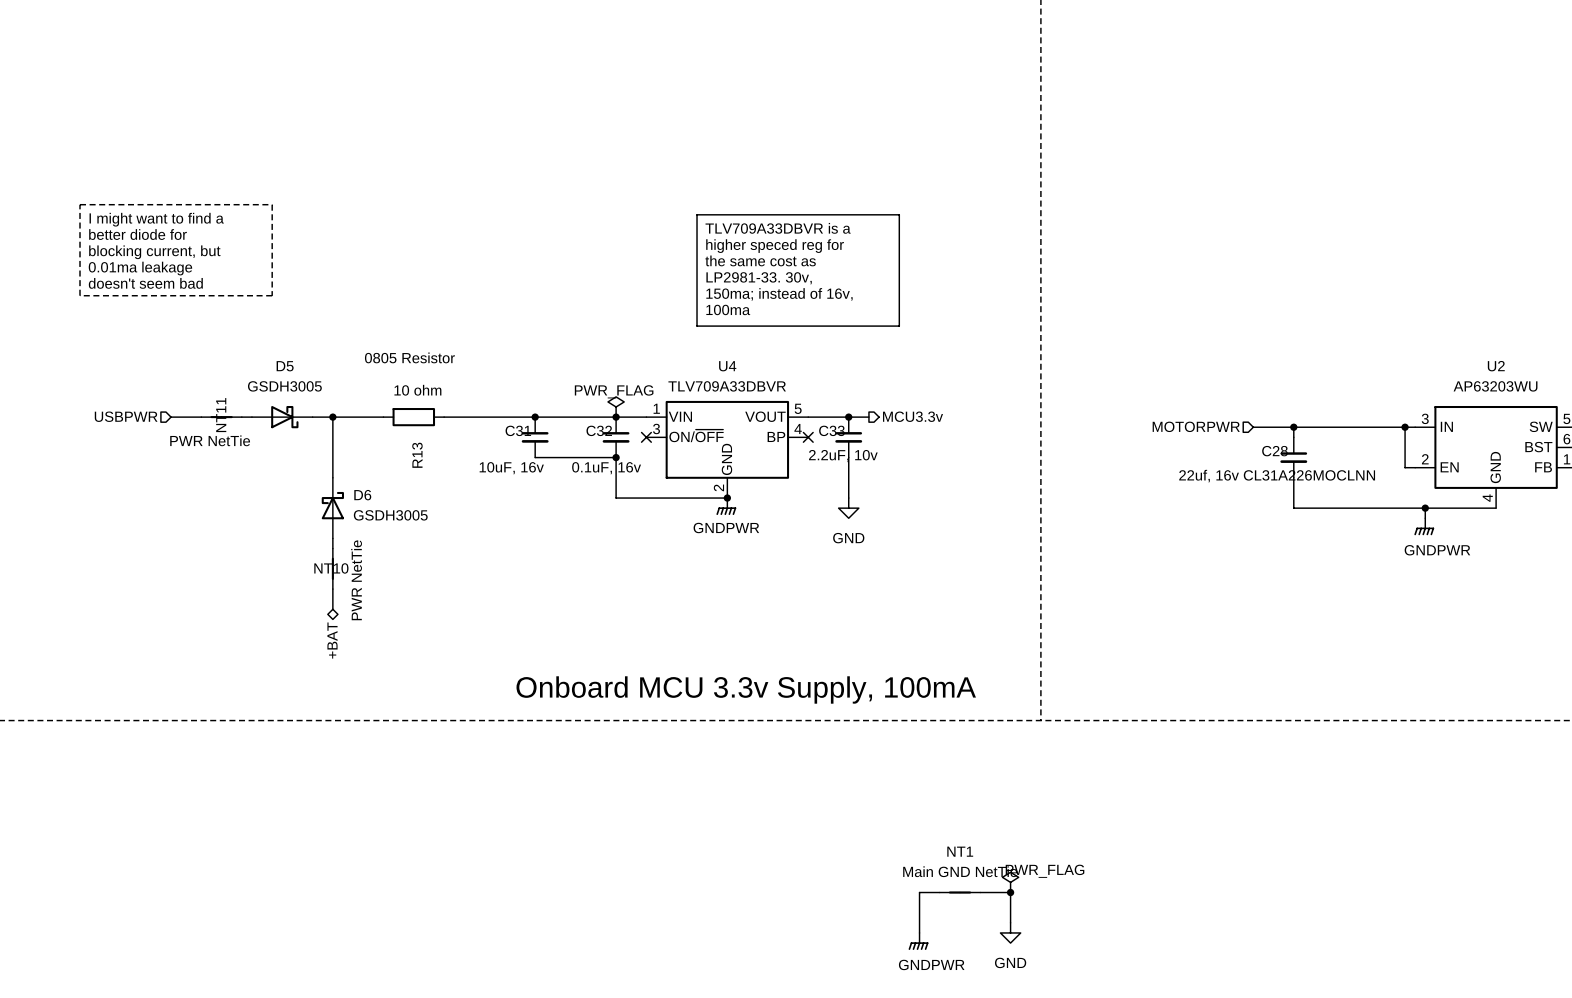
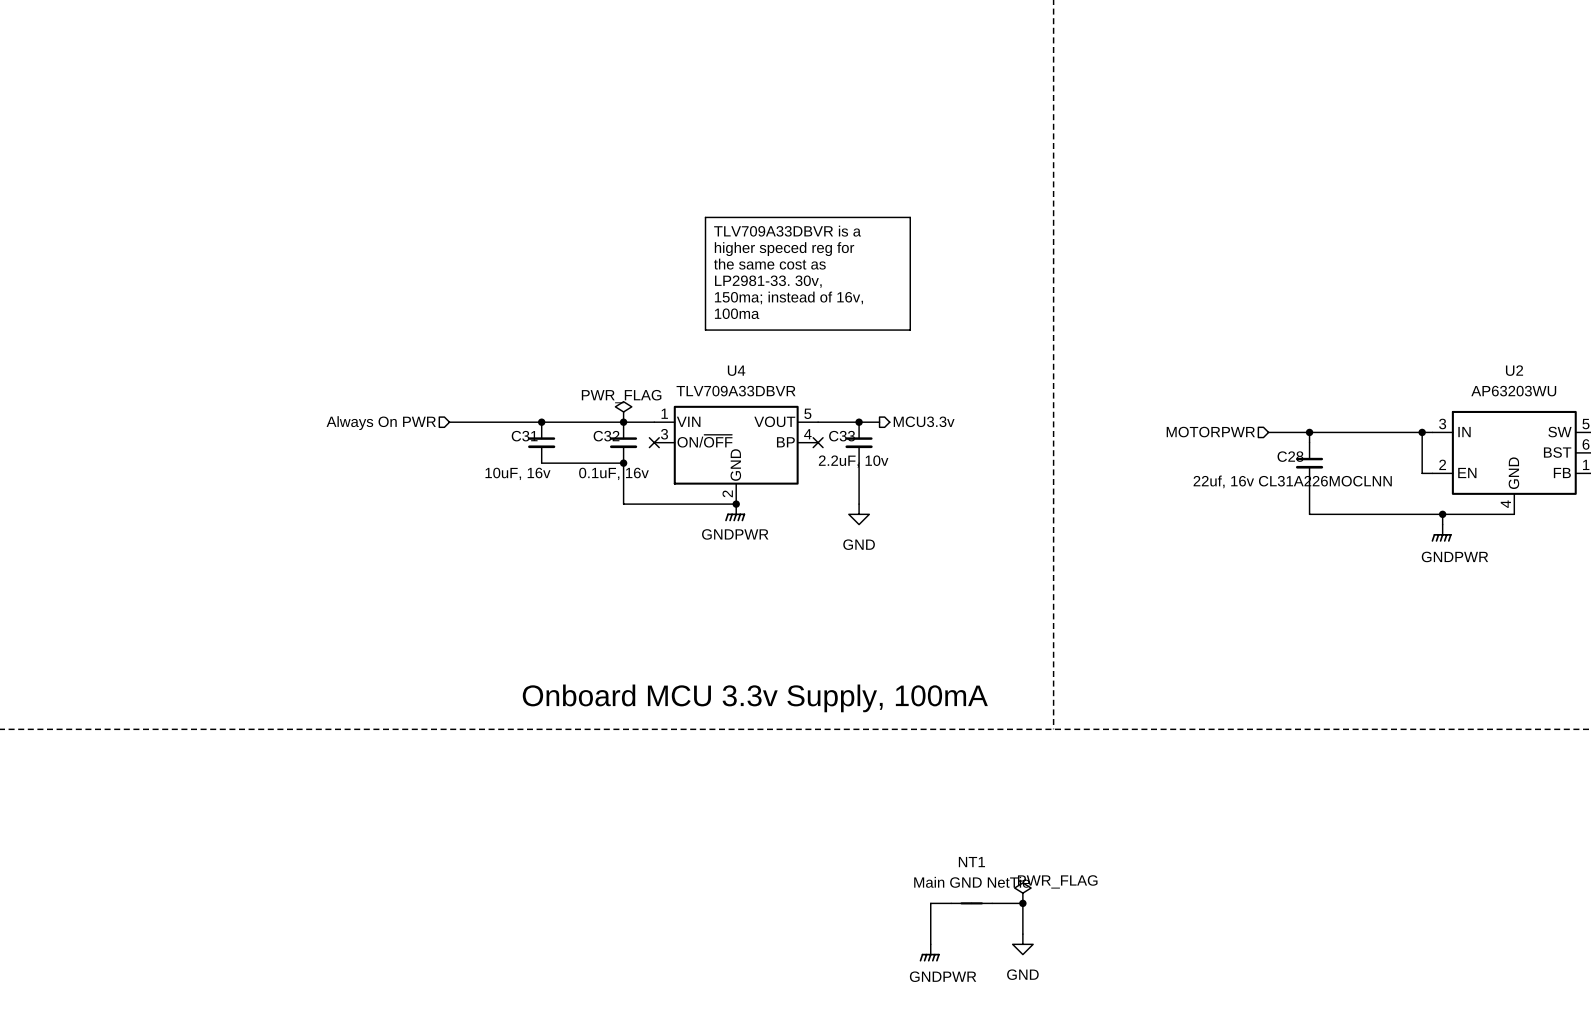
line: (80, 204) (272, 204) (272, 295) (80, 295) (80, 204) -> none
text: I might want to find a (156, 219) -> none
text: better diode for (137, 234) -> none
text: blocking current, but (154, 252) -> none
text: 0.01ma leakage (140, 268) -> none
text: doesn't seem bad (145, 283) -> none
text: 0805 Resistor (409, 357) -> none
hierarchical label: USBPWR (126, 416) -> none
wire: (171, 417) (201, 417) -> none
NT11: PWR NetTie (221, 417) -> none
wire: (241, 417) (251, 417) -> none
D5: GSDH3005 (282, 417) -> none
wire: (312, 417) (383, 417) -> none
wire: (332, 417) (332, 477) -> none
junction: (332, 417) -> none
hierarchical label: none -> Always On PWR (381, 423)
R13: 10 ohm (413, 417) -> none
D6: GSDH3005 (332, 508) -> none
wire: (332, 538) (332, 548) -> none
NT10: PWR NetTie (332, 568) -> none
wire: (332, 589) (332, 609) -> none
hierarchical label: +BAT (332, 640) -> none

